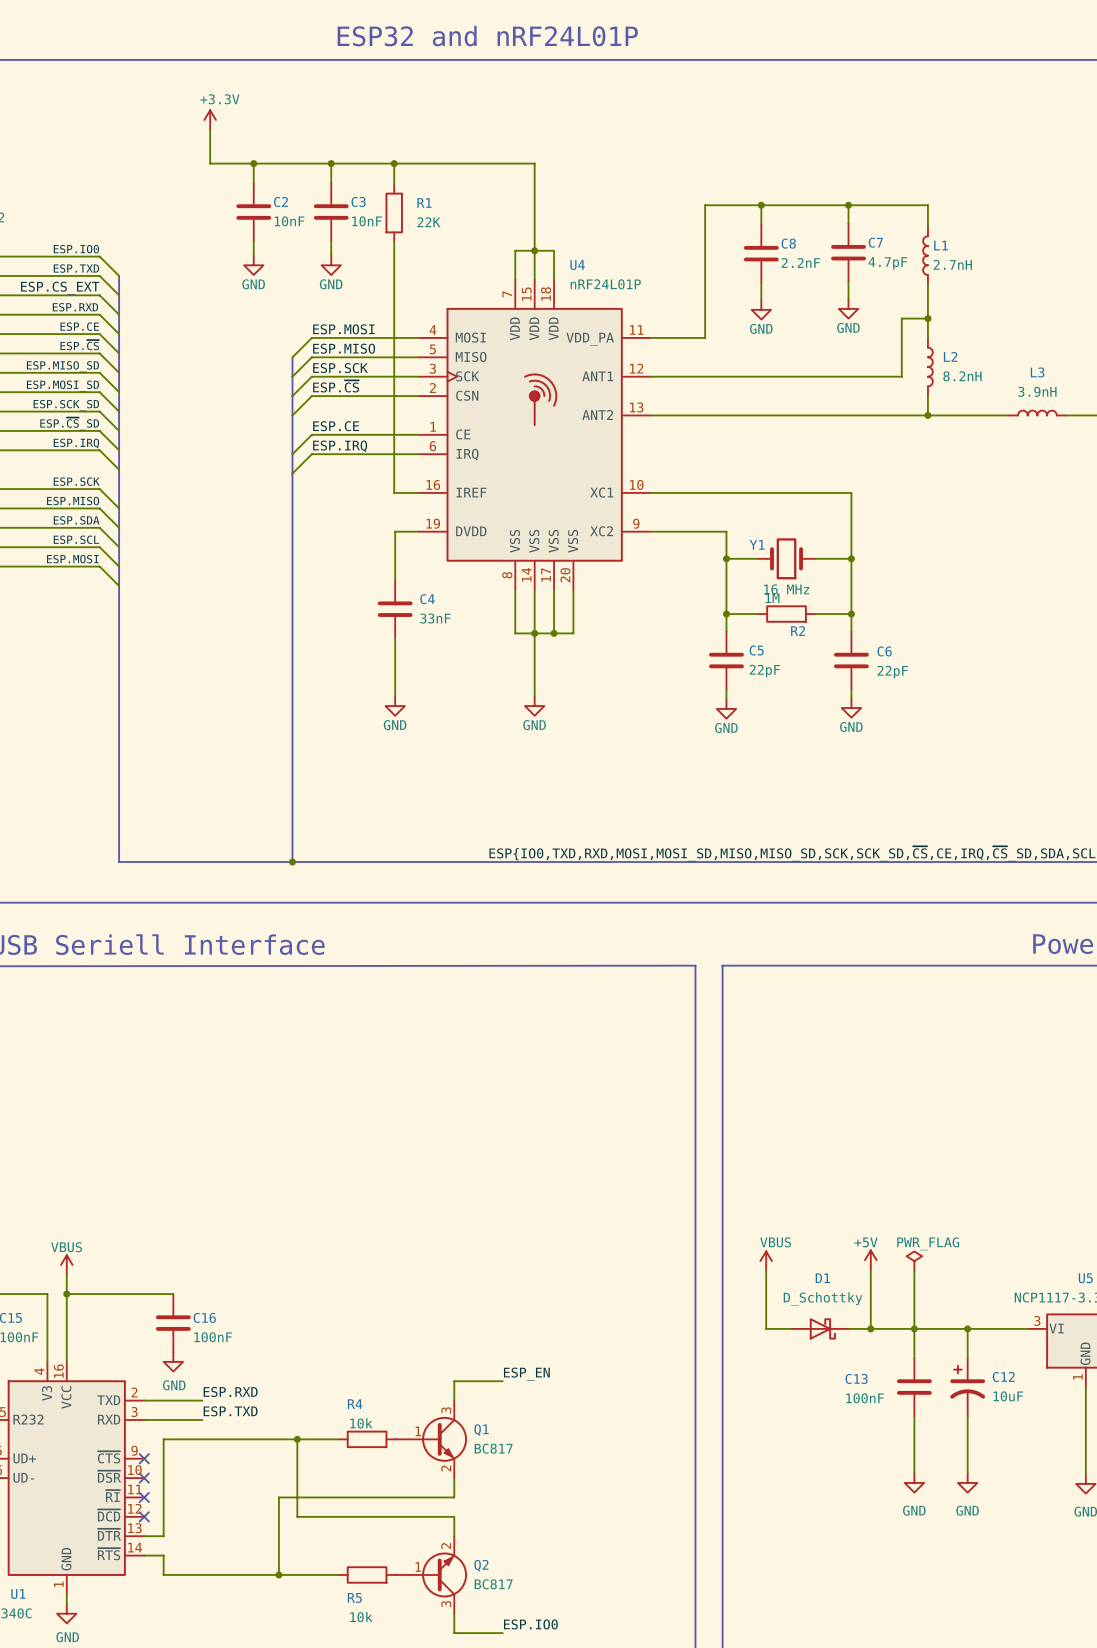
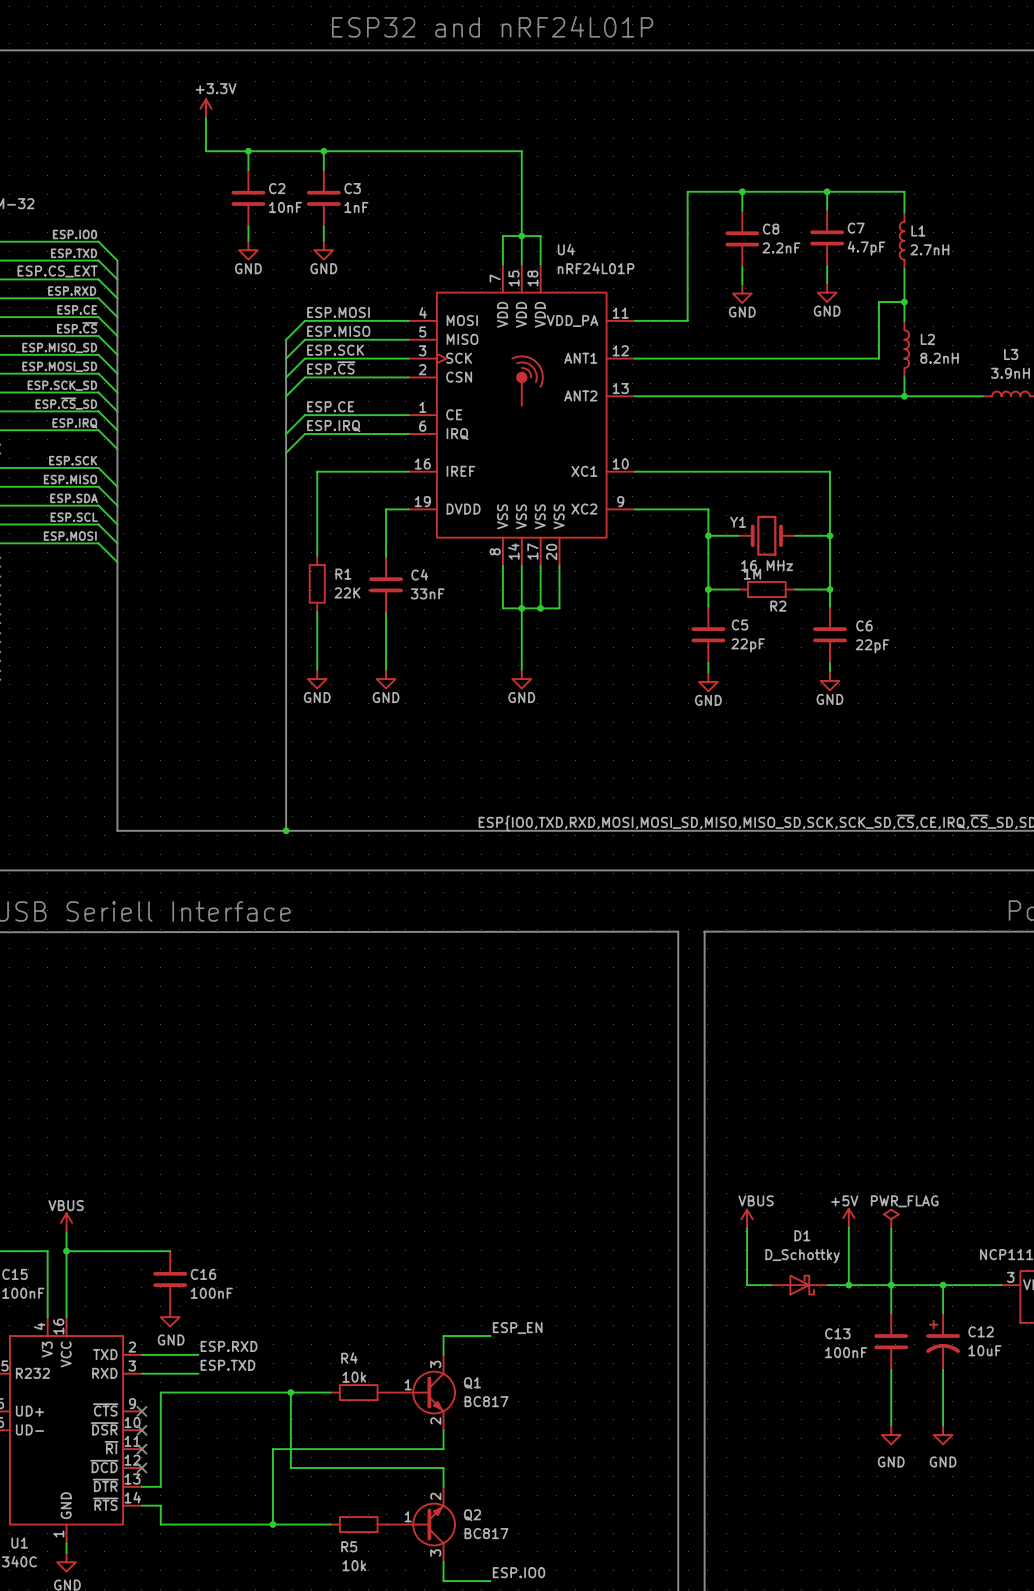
wire: (394, 163) (394, 183) -> none
junction: (394, 163) -> none
R1 name position: R1 (424, 202) -> R1 (343, 574)
R1 position: (394, 212) -> (317, 583)
C3 value: 10nF (367, 221) -> 1nF (356, 207)
R1 value position: 22K (428, 222) -> 22K (347, 592)
wire: (394, 242) (394, 492) -> (317, 555) (317, 471) (385, 471)
wire: none -> (317, 612) (317, 669)
power symbol: none -> GND (317, 679)

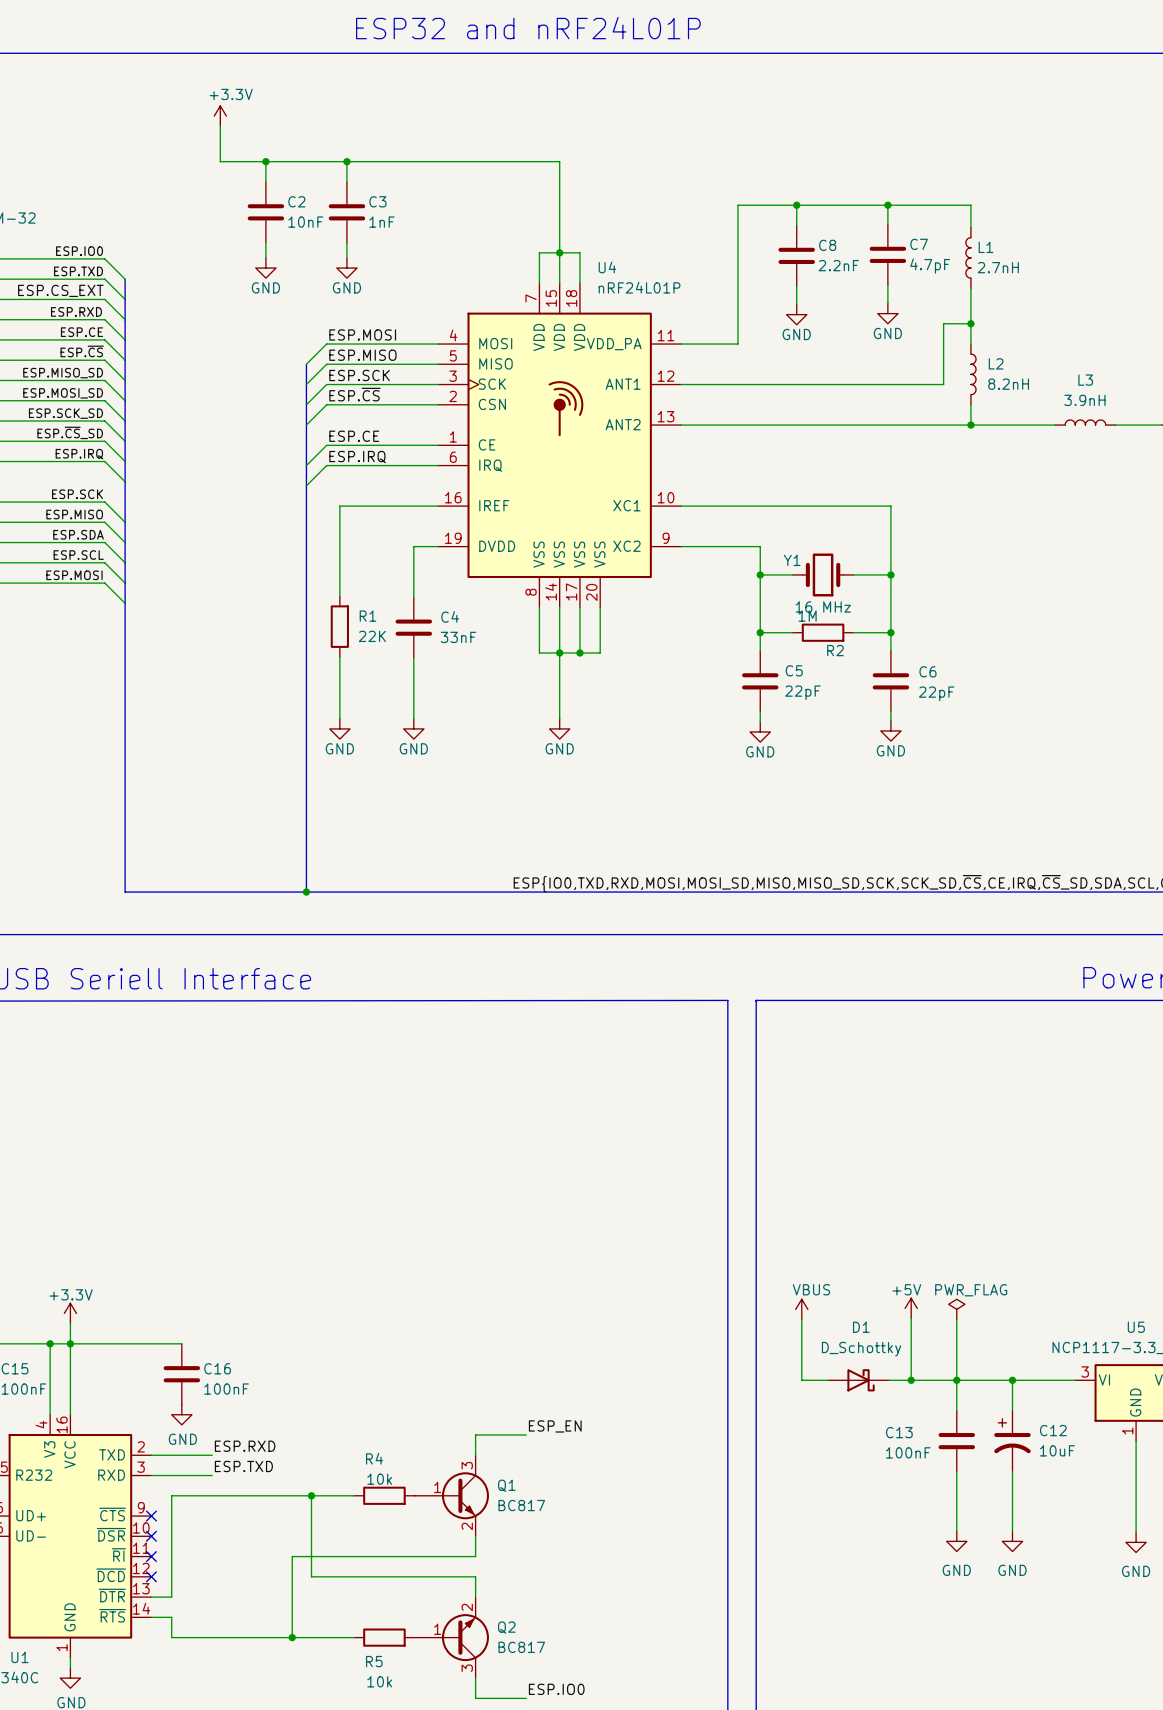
power symbol: VBUS (66, 1222) -> +3.3V (70, 1313)
wire: none -> (50, 1343) (70, 1343)
junction: none -> (50, 1343)

